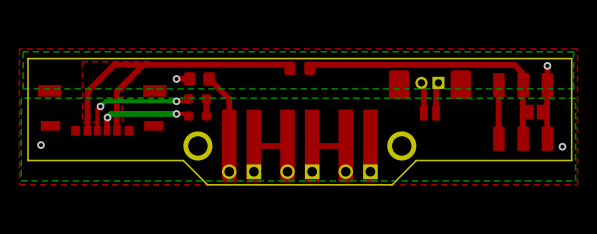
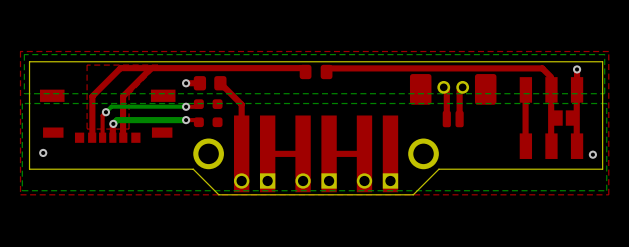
part: none -> (443, 87)
part: (429, 82) -> none
part: none -> (462, 87)
top track: (206, 98) (206, 115) -> none

